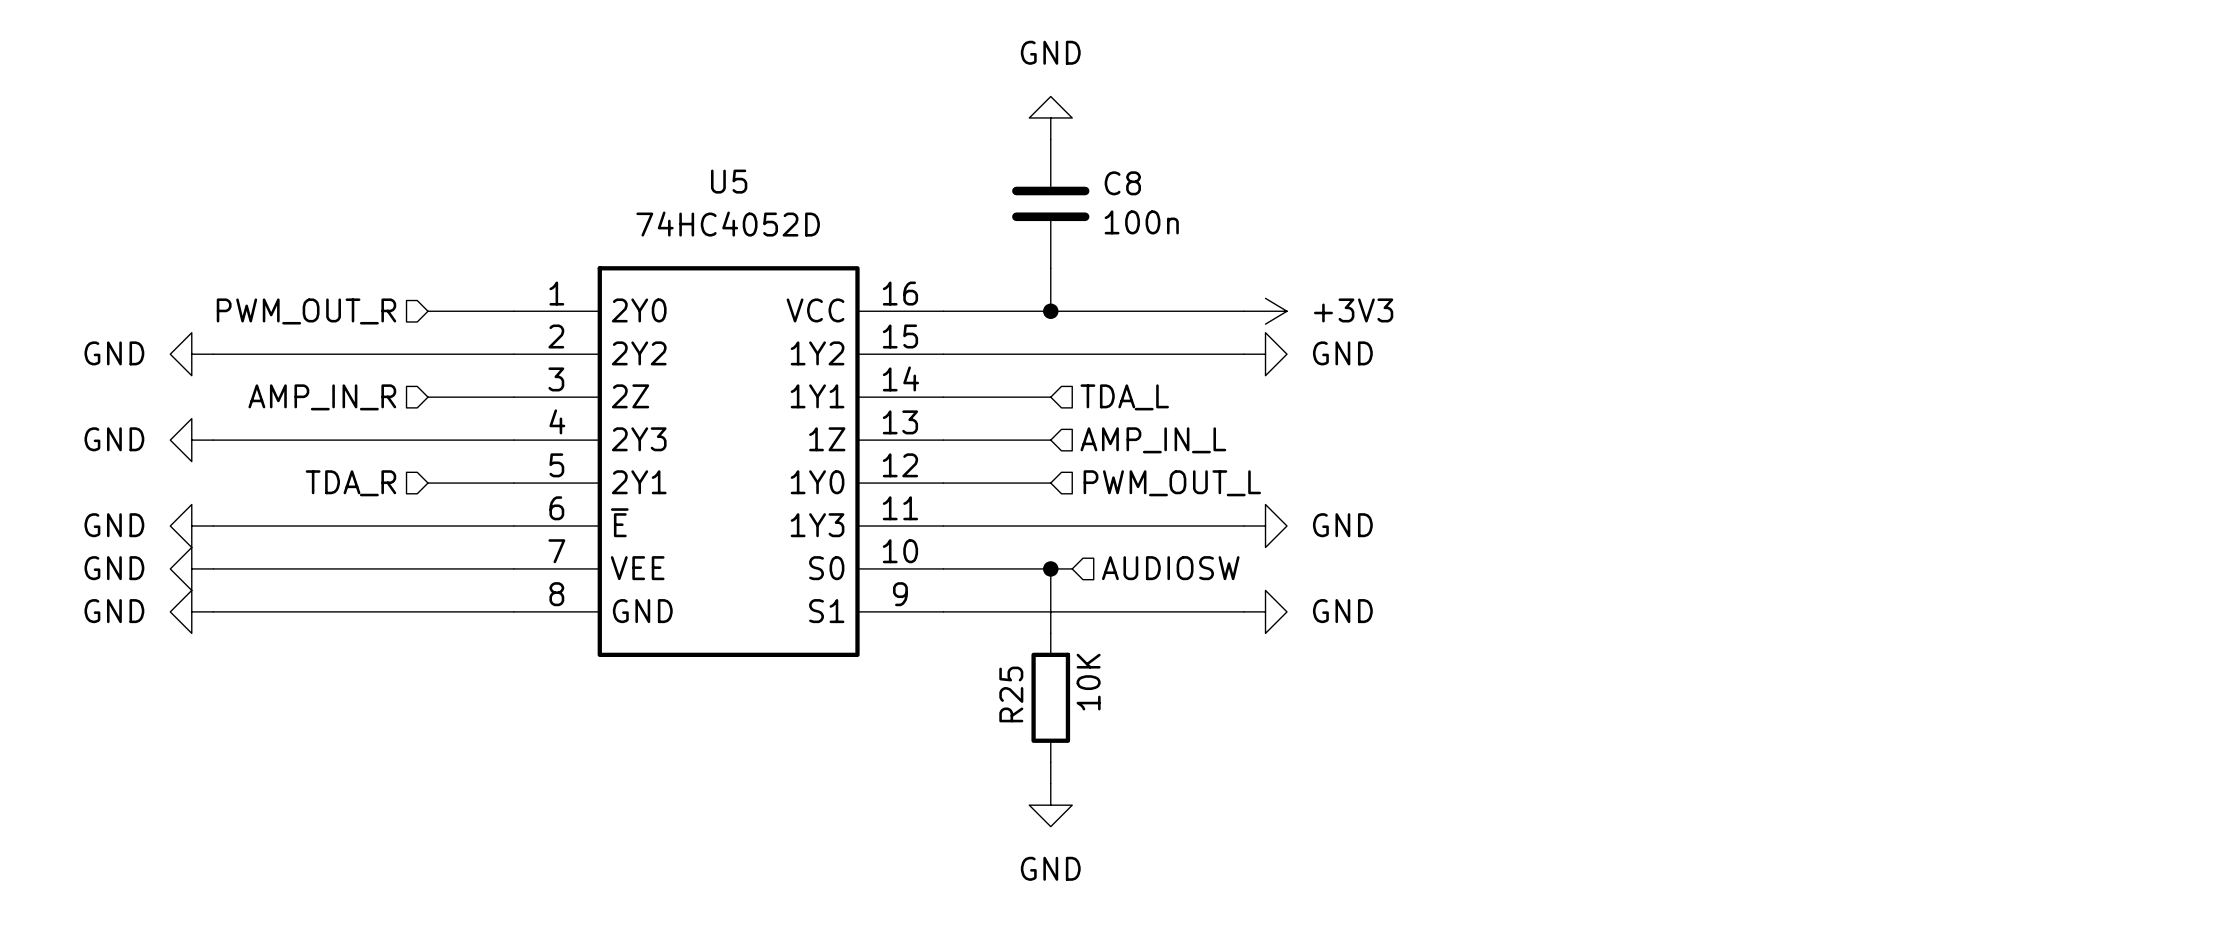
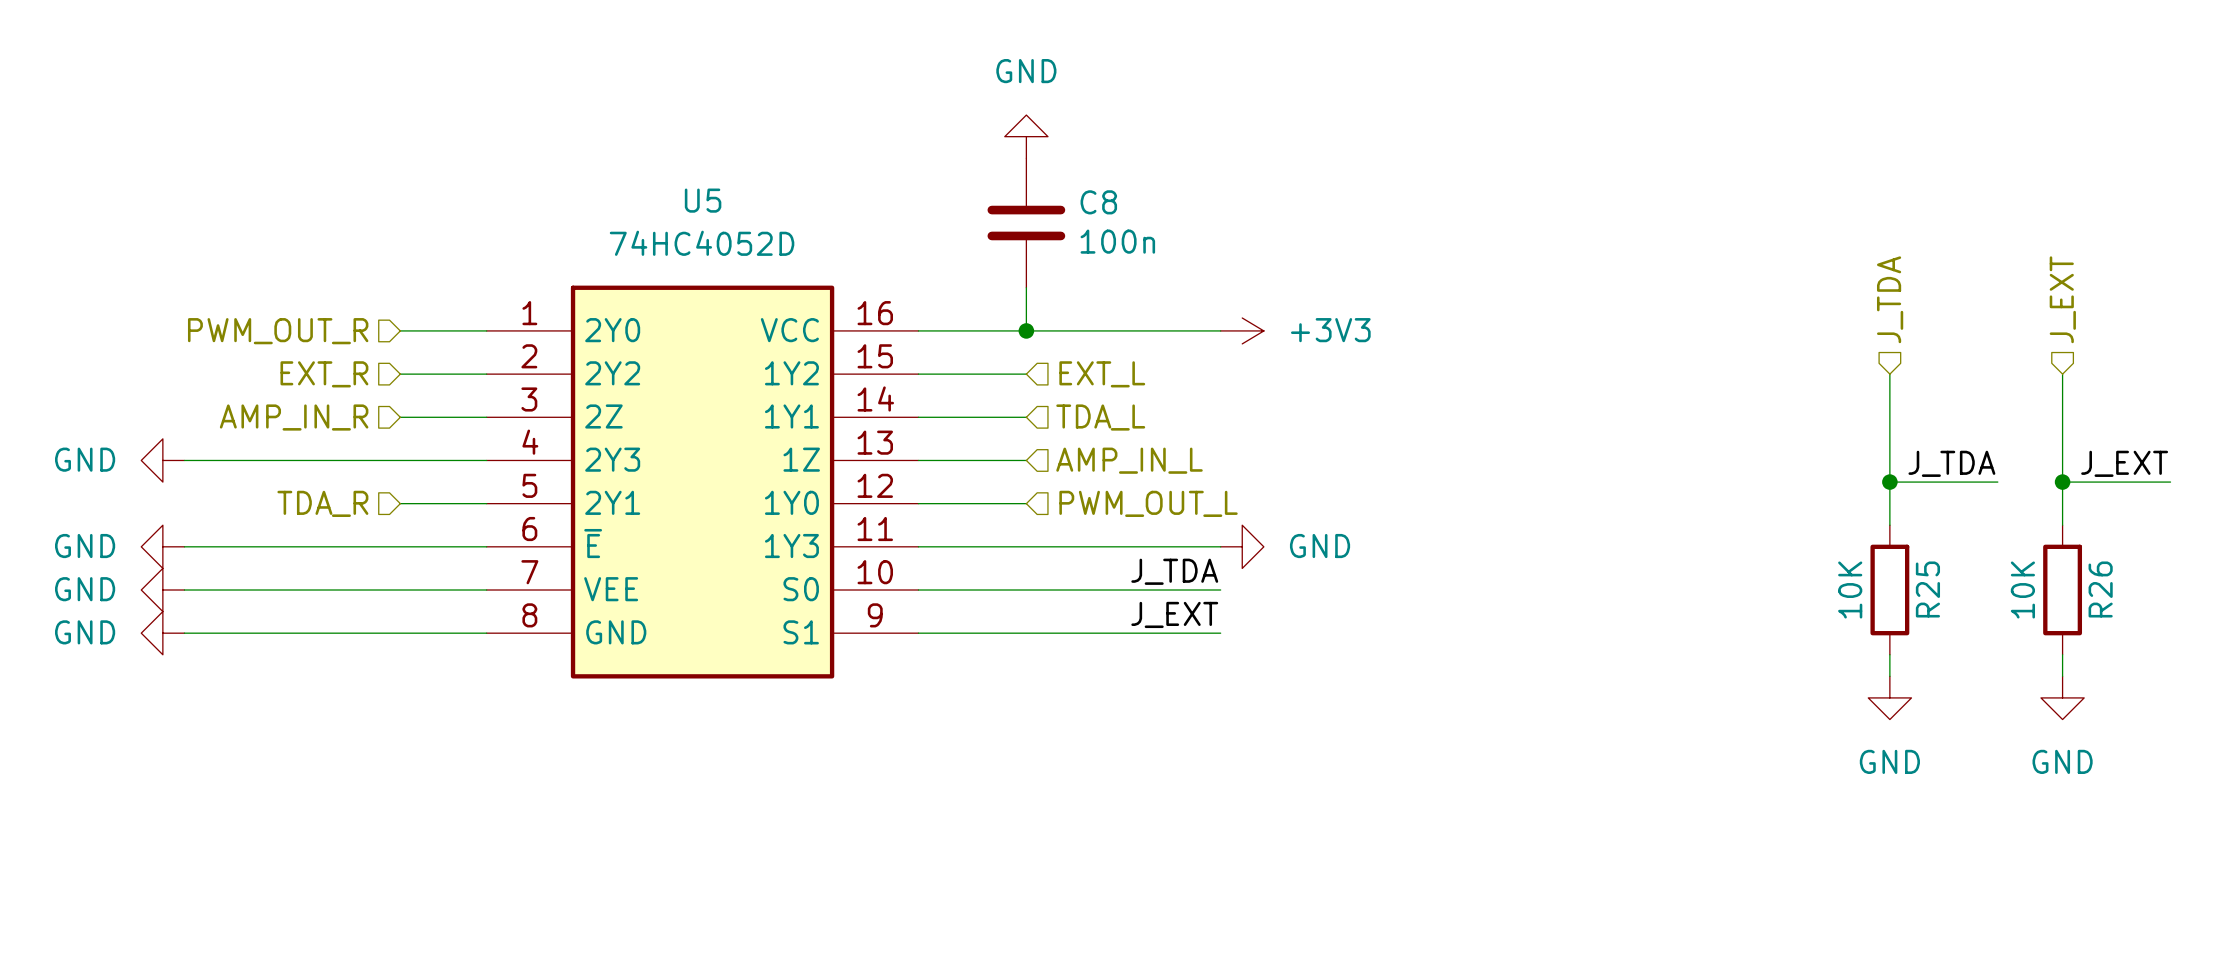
hierarchical label: none -> J_TDA (1890, 299)
hierarchical label: none -> J_EXT (2062, 299)
power symbol: GND (191, 354) -> none
wire: (213, 354) (427, 354) -> none
hierarchical label: none -> EXT_R (324, 374)
wire: (1050, 354) (1244, 354) -> none
hierarchical label: none -> EXT_L (1102, 374)
power symbol: GND (1265, 354) -> none
wire: none -> (1889, 374) (1889, 525)
wire: none -> (2062, 374) (2062, 525)
label: none -> J_TDA (1951, 463)
label: none -> J_EXT (2124, 463)
wire: none -> (1889, 482) (1997, 482)
junction: none -> (1889, 482)
wire: none -> (2062, 482) (2170, 482)
junction: none -> (2062, 482)
label: none -> J_TDA (1174, 571)
wire: (1050, 568) (1050, 633) -> none
junction: (1050, 568) -> none
wire: none -> (1047, 590) (1220, 590)
hierarchical label: AUDIOSW (1170, 568) -> none
R26: none -> 10K (2062, 590)
label: none -> J_EXT (1174, 614)
power symbol: GND (1265, 611) -> none
wire: none -> (1889, 654) (1889, 676)
wire: none -> (2062, 654) (2062, 676)
power symbol: none -> GND (1889, 697)
power symbol: none -> GND (2062, 697)
R25 value position: 10K (1088, 682) -> 10K (1850, 590)
R25 name position: R25 (1011, 694) -> R25 (1927, 589)
R25 position: (1050, 697) -> (1889, 590)
wire: (1050, 762) (1050, 783) -> none
power symbol: GND (1050, 805) -> none

